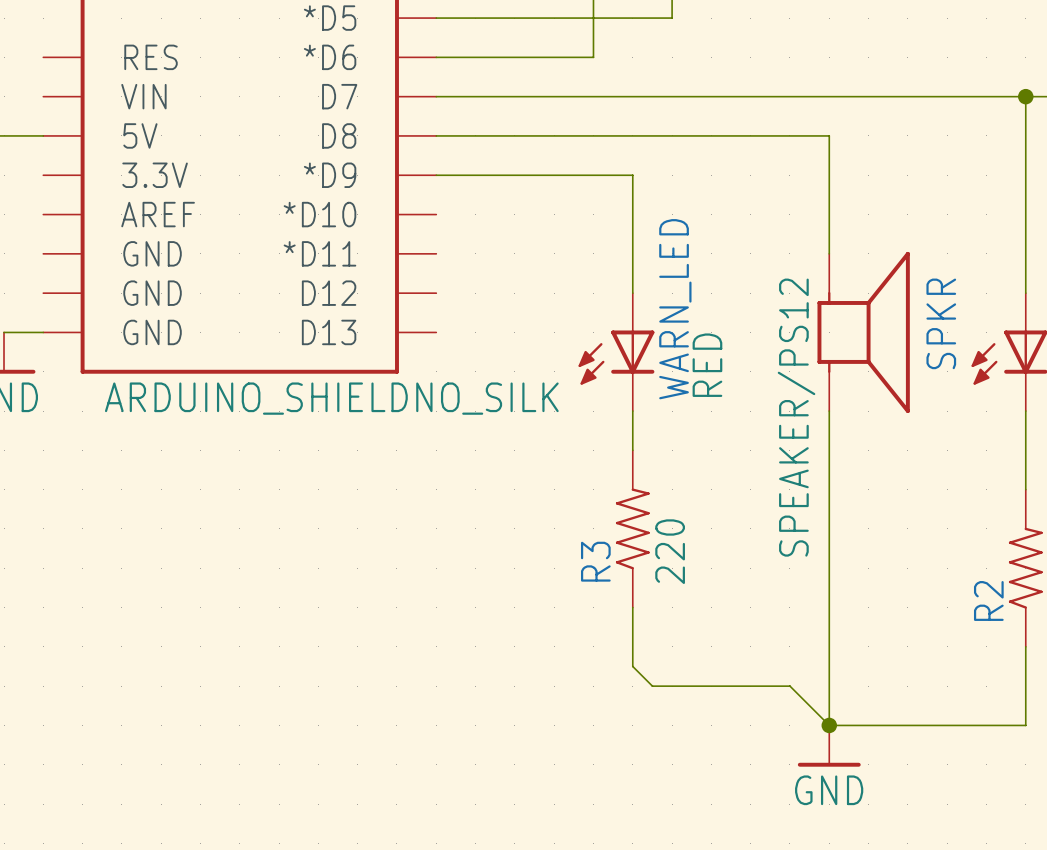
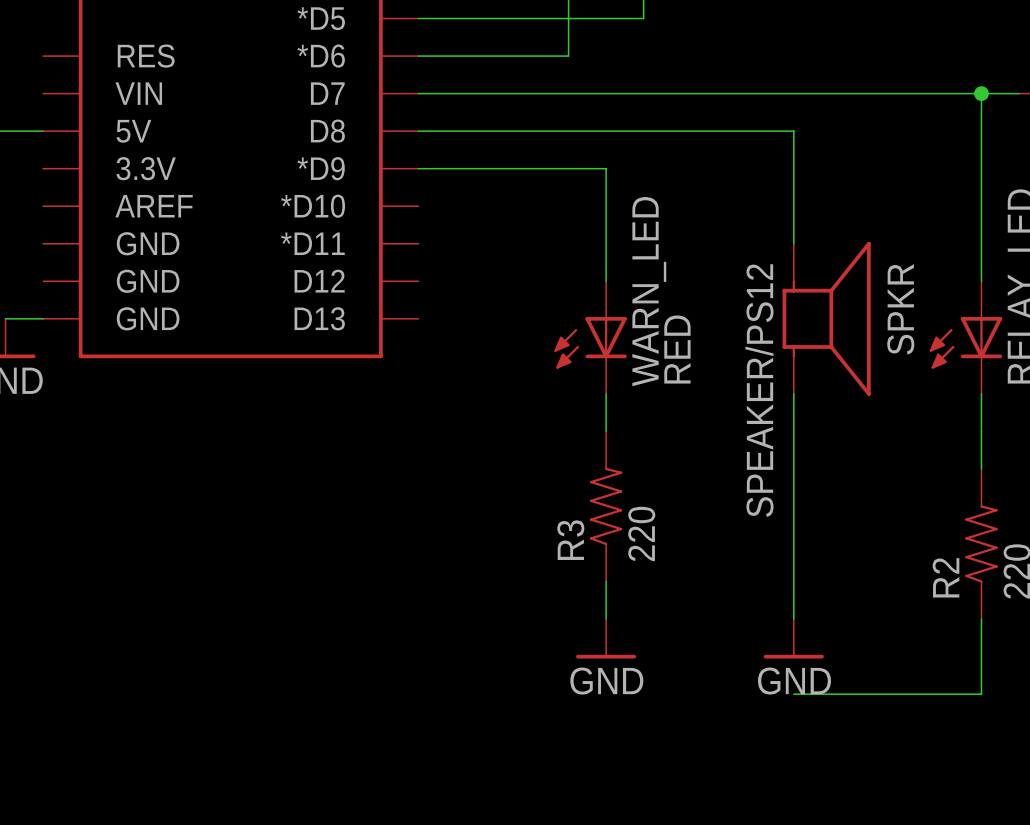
part value: ARDUINO_SHIELDNO_SILK (331, 398) -> none
wire: (632, 646) (632, 666) (652, 686) (789, 686) (829, 725) (829, 646) -> none
power symbol: none -> GND (606, 638)
junction: (829, 725) -> none
power symbol position: GND (829, 746) -> GND (793, 638)

